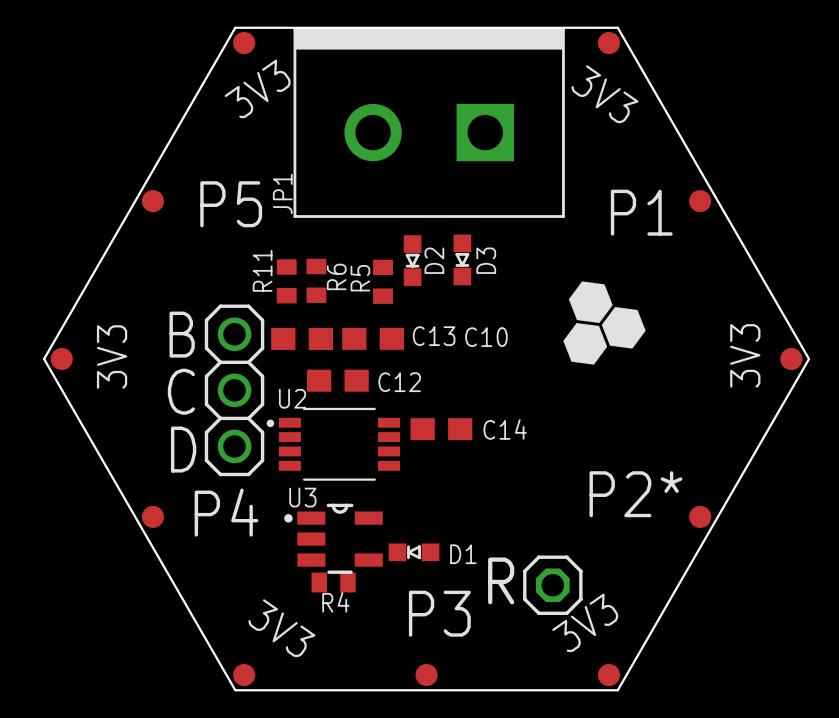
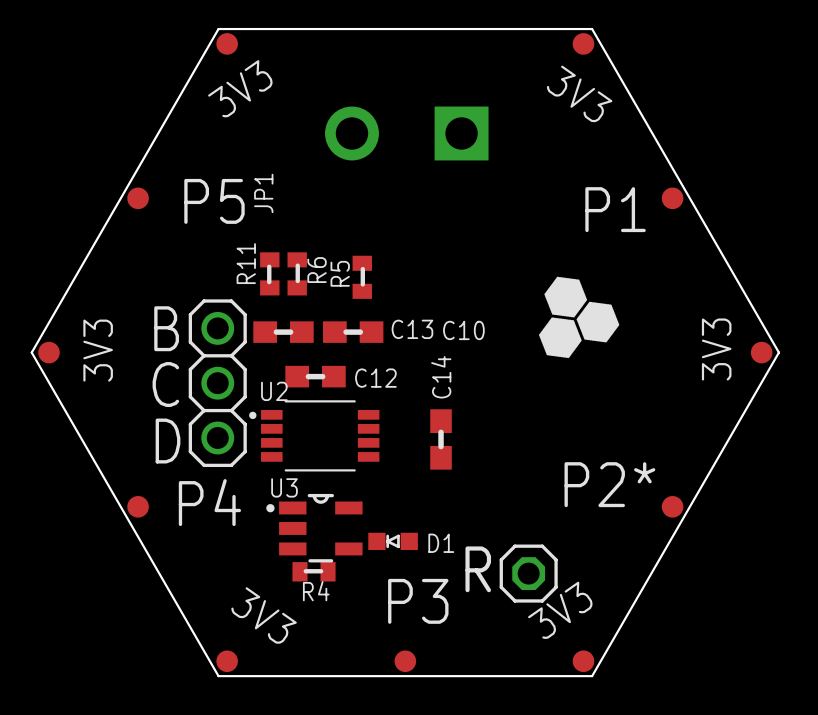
JP1 footprint: [293, 27, 565, 218] -> [325, 106, 489, 161]
R6 footprint: [306, 258, 327, 303] -> [287, 252, 307, 296]
R11 footprint: [276, 259, 297, 304] -> [260, 252, 280, 296]
R5 footprint: [373, 259, 393, 304] -> [352, 255, 372, 299]
D3: (462, 259) -> none
D2: (412, 260) -> none
C13 footprint: [271, 327, 334, 351] -> [253, 321, 314, 343]
C10 footprint: [342, 327, 405, 350] -> [323, 321, 384, 343]
C12 footprint: [306, 369, 369, 392] -> [285, 365, 346, 388]
C14 footprint: [410, 418, 473, 441] -> [430, 409, 452, 470]
C14 name position: C14 (505, 429) -> C14 (441, 377)
R4 footprint: [311, 572, 356, 593] -> [292, 562, 336, 582]

